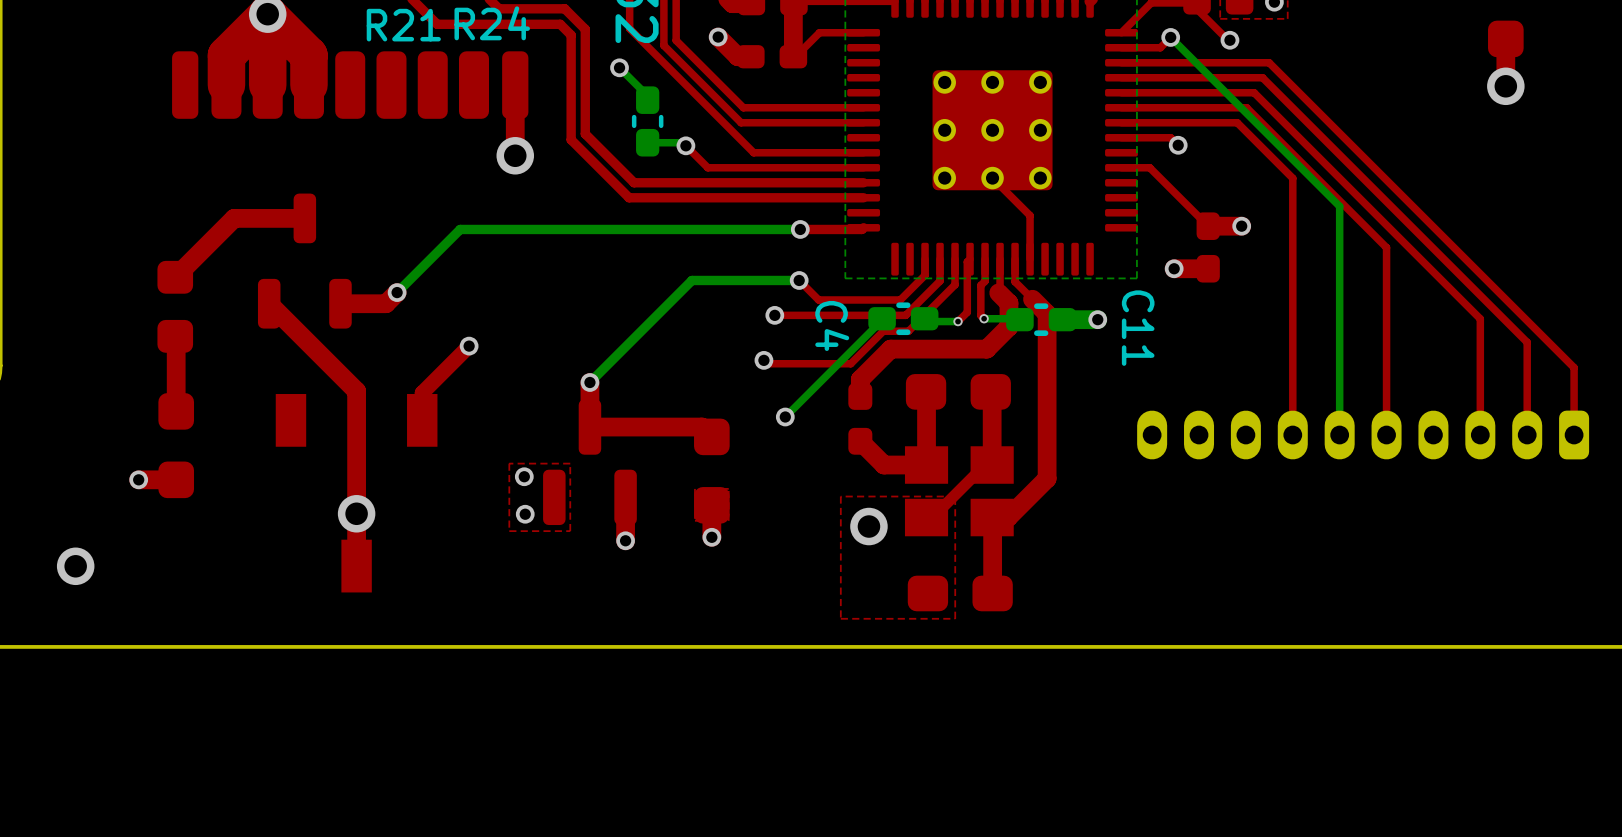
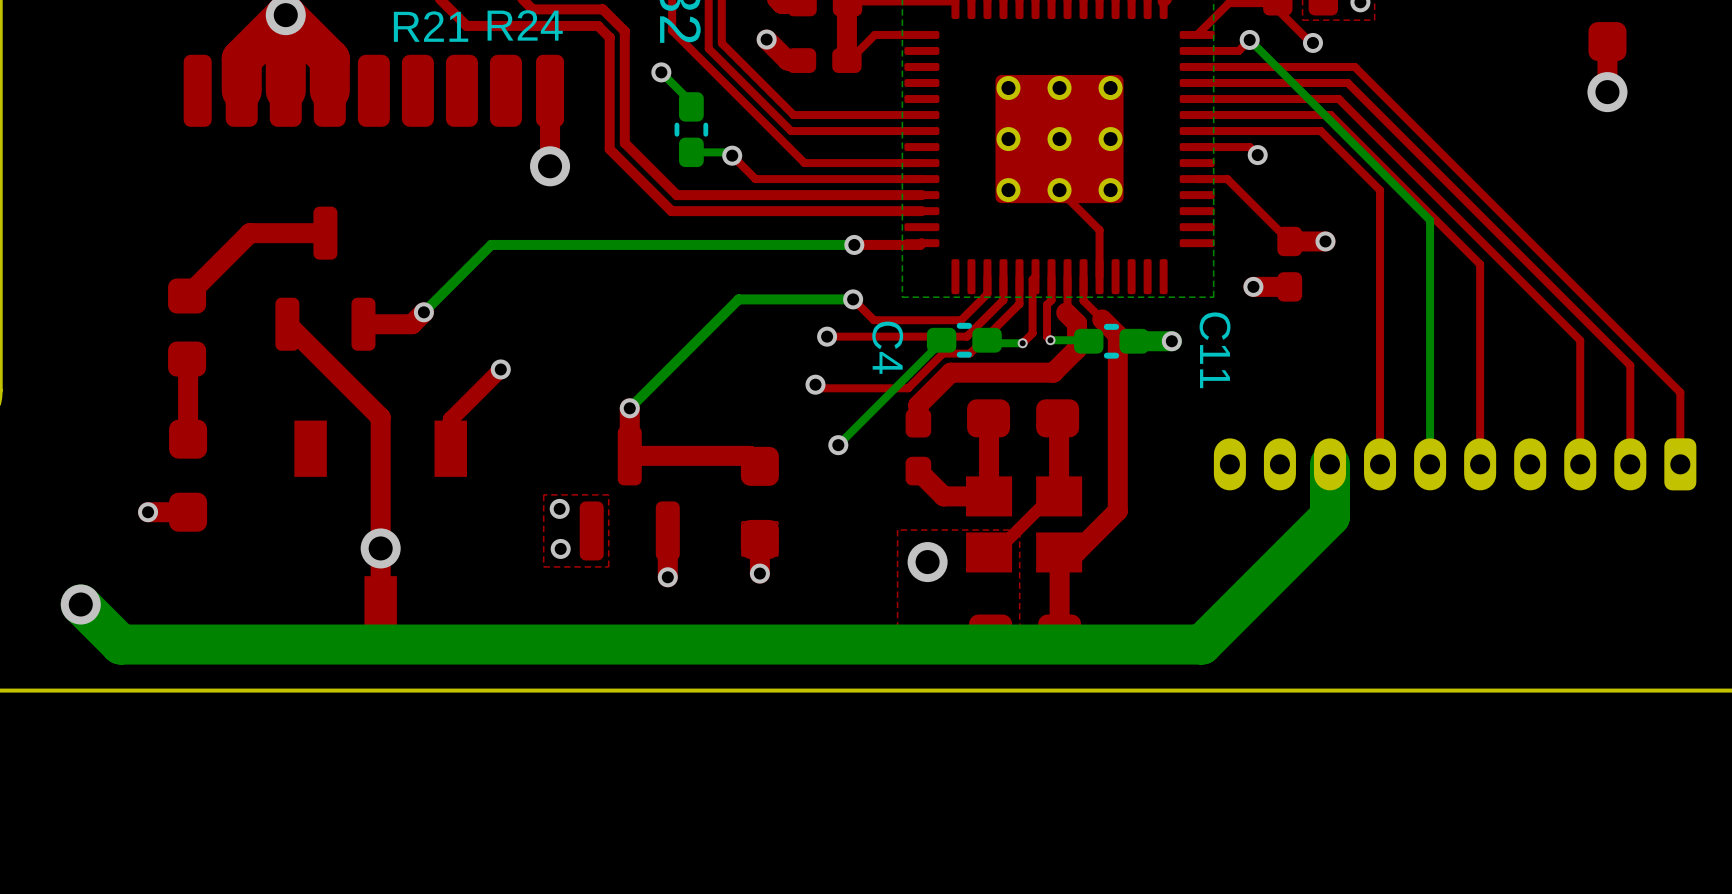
bottom track: none -> (1329, 464) (1329, 516) (1201, 644) (120, 644) (80, 604)

